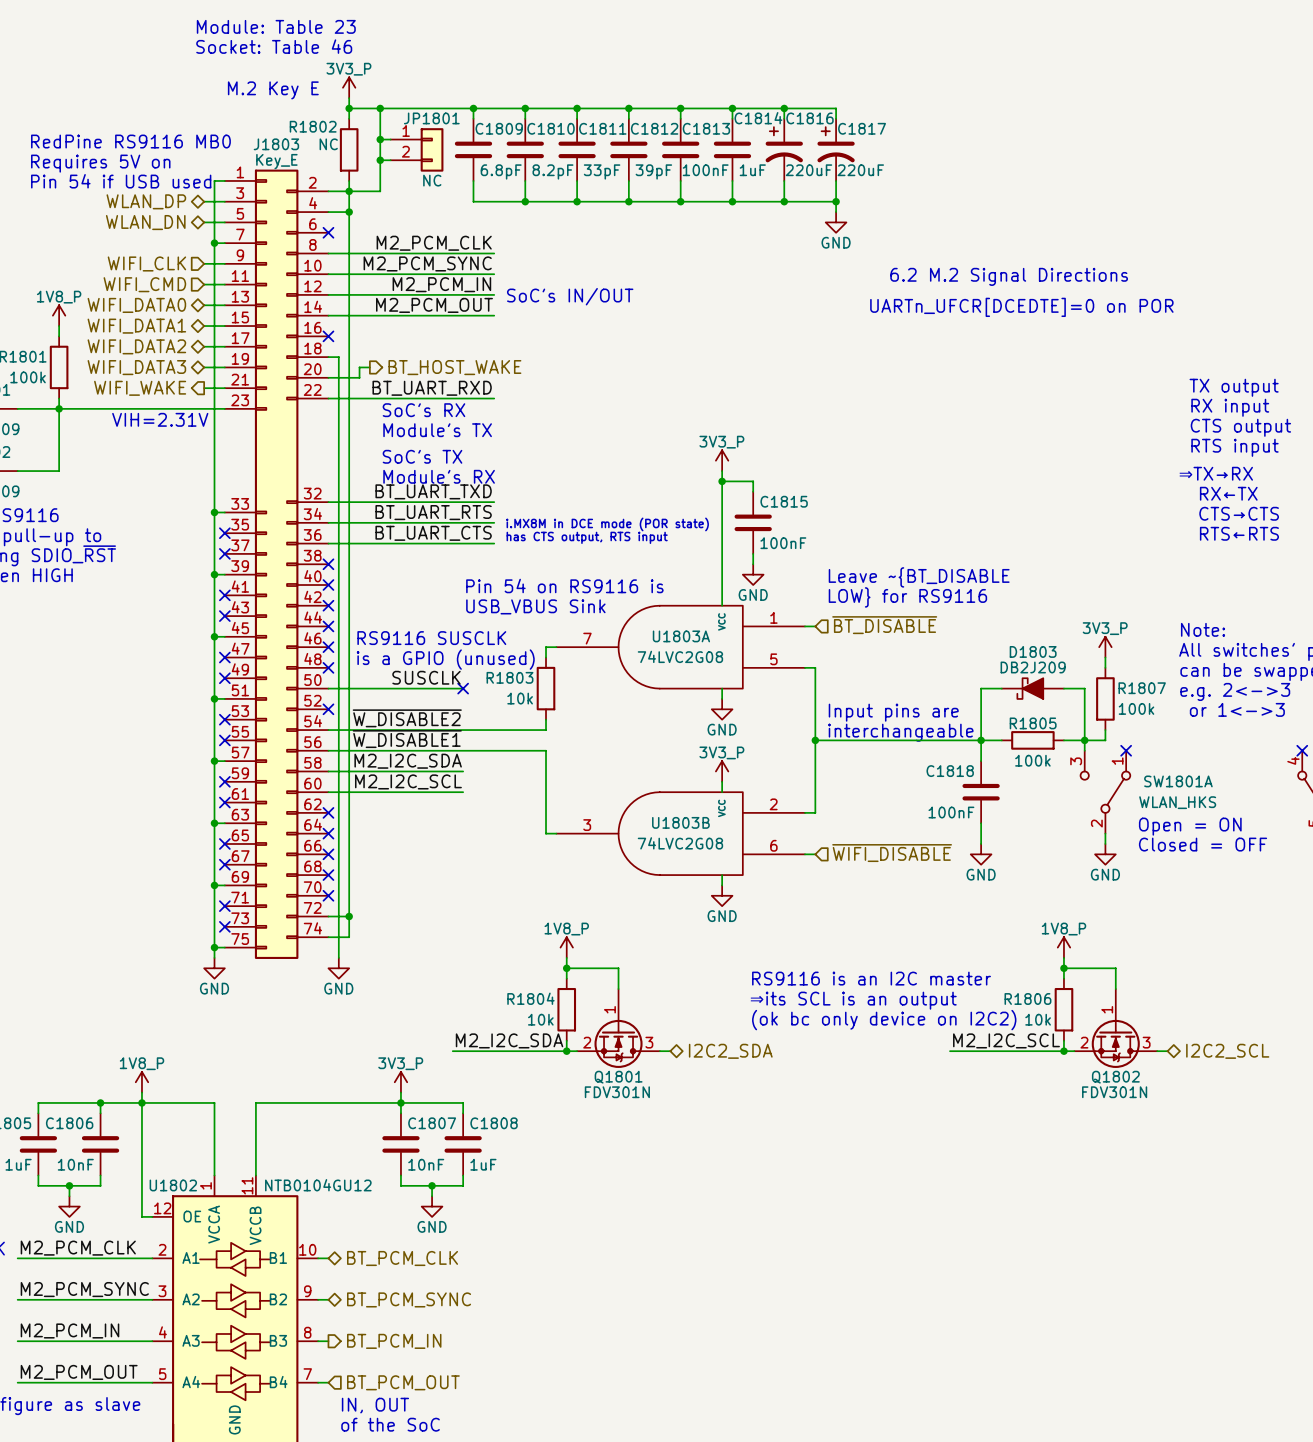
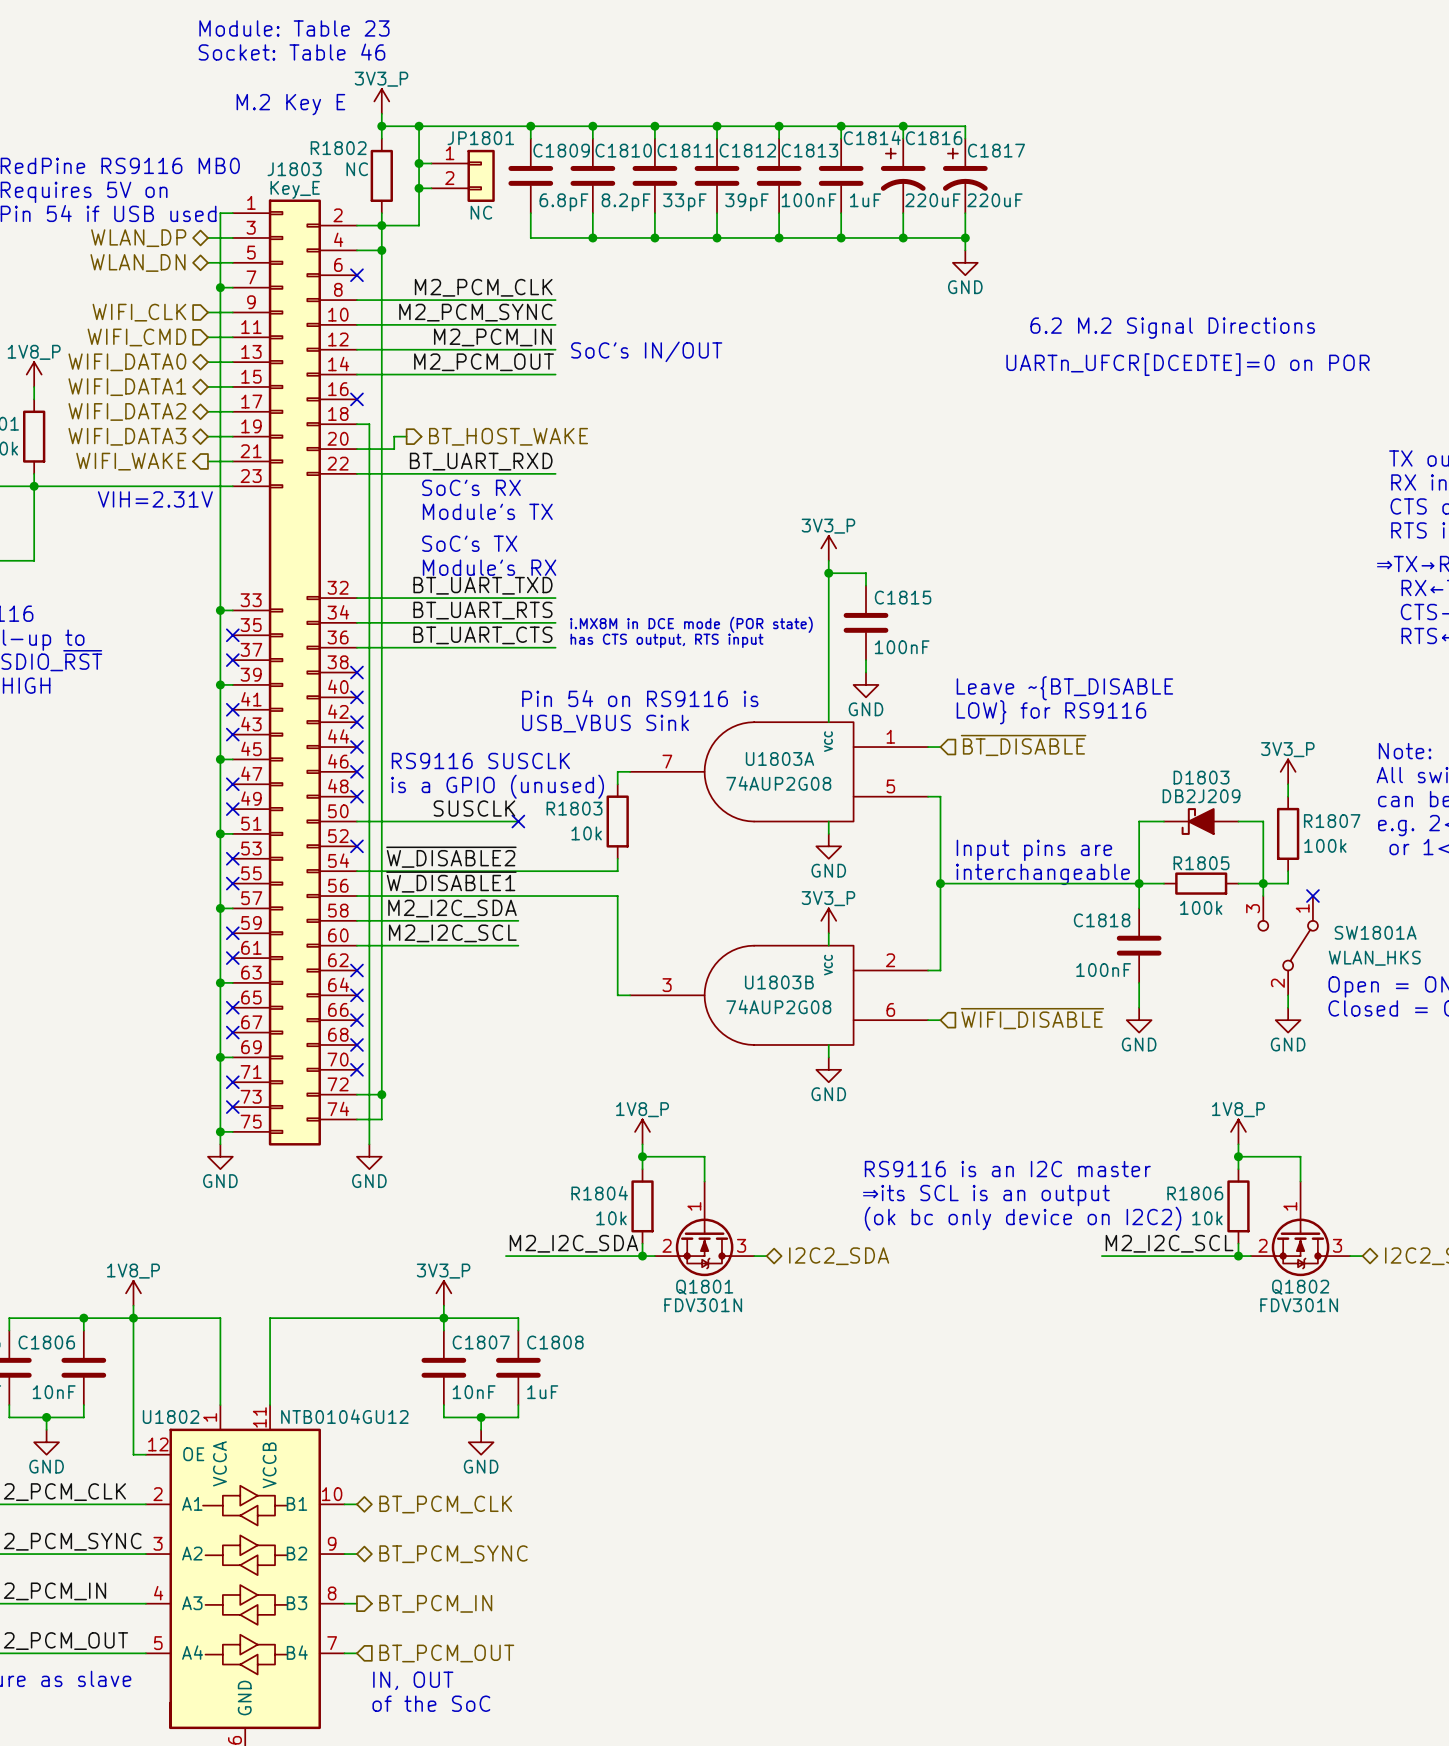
U1803A value: 74LVC2G08 (680, 656) -> 74AUP2G08 (778, 783)
U1803B value: 74LVC2G08 (680, 843) -> 74AUP2G08 (778, 1006)

